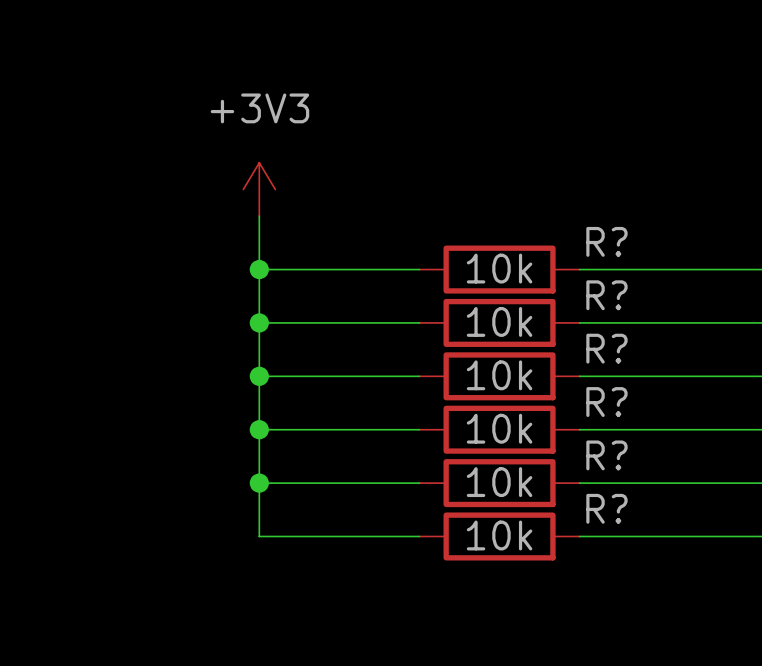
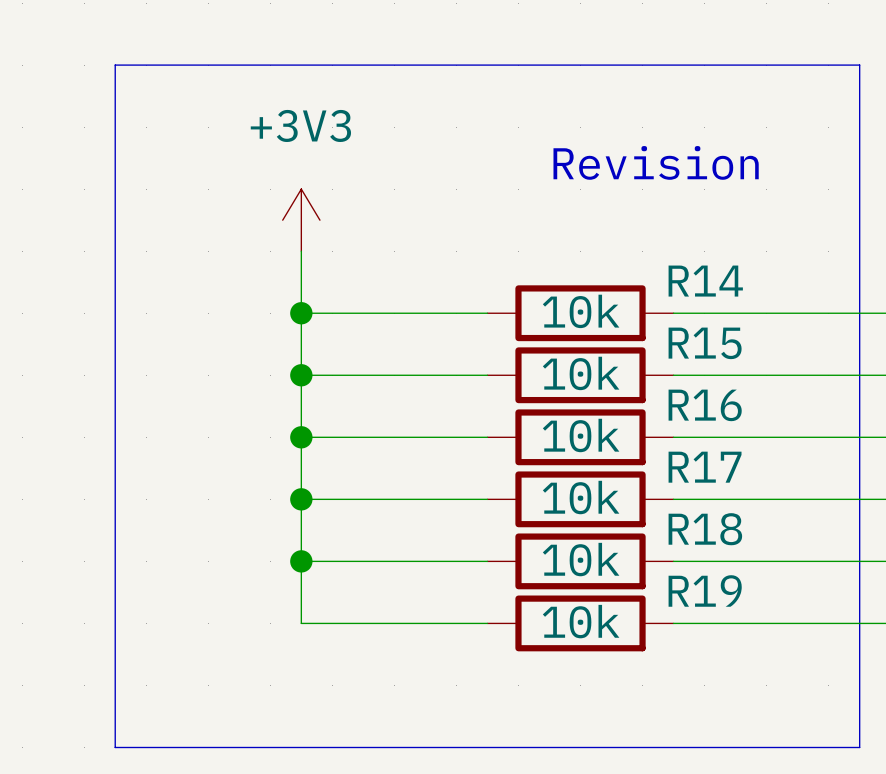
line: none -> (115, 65) (115, 747) (859, 747) (859, 65) (115, 65)
text: none -> Revision (656, 162)
R? name: R? (606, 241) -> R14 (705, 281)
R? name: R? (606, 295) -> R15 (705, 343)
R? name: R? (606, 348) -> R16 (705, 405)
R? name: R? (606, 402) -> R17 (705, 467)
R? name: R? (606, 455) -> R18 (705, 529)
R? name: R? (606, 508) -> R19 (705, 590)

